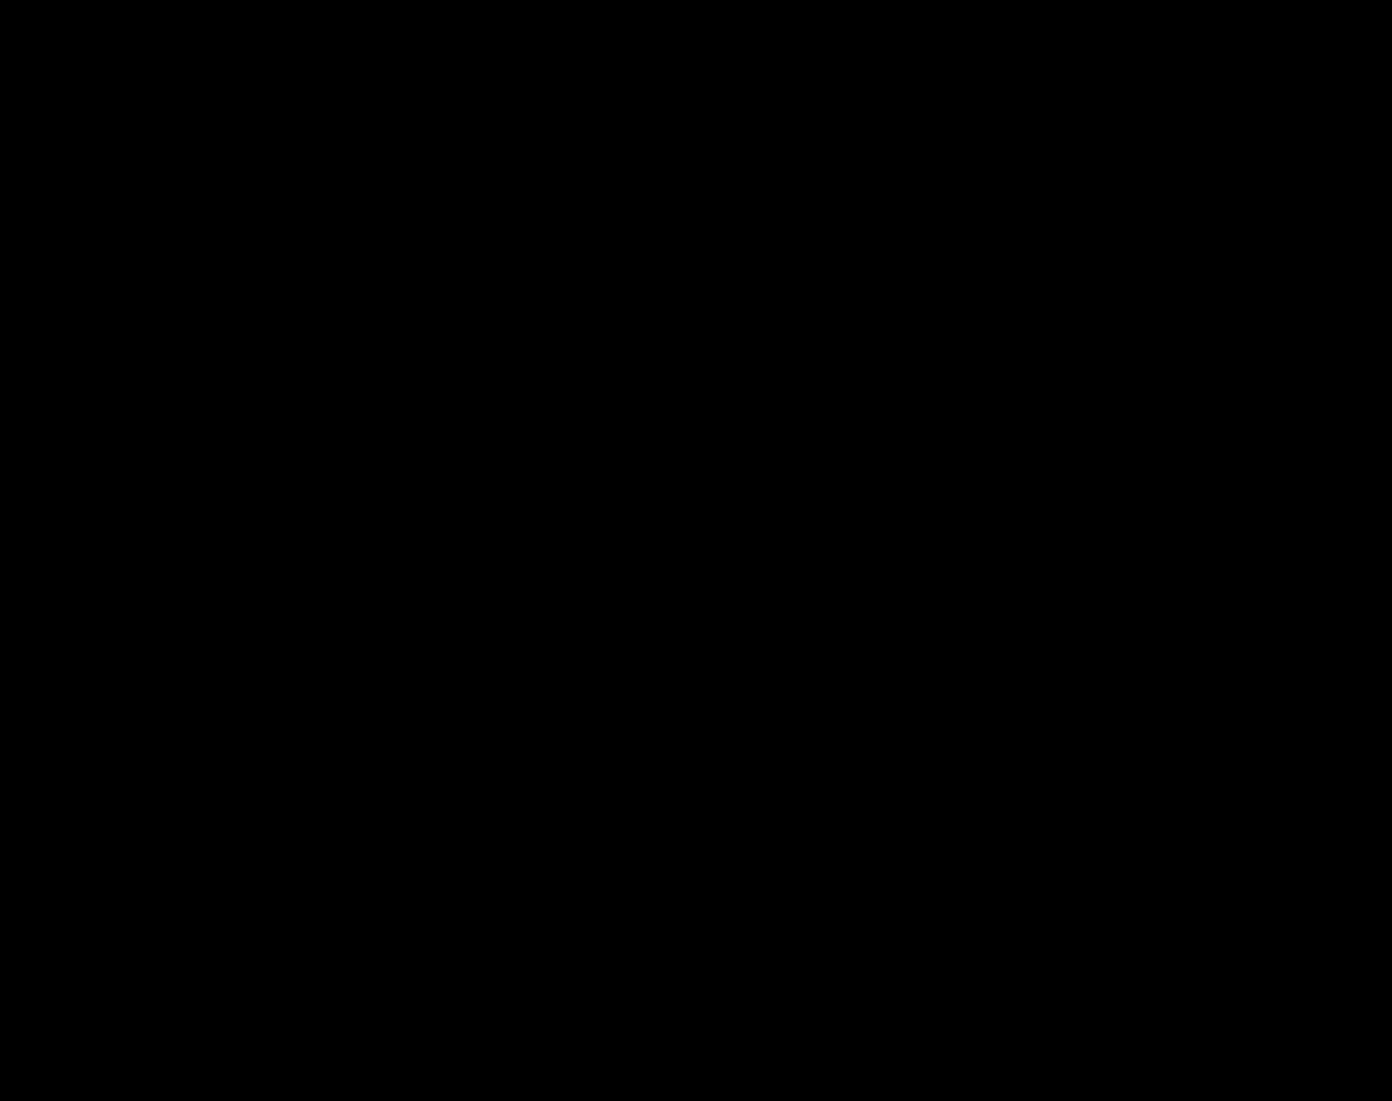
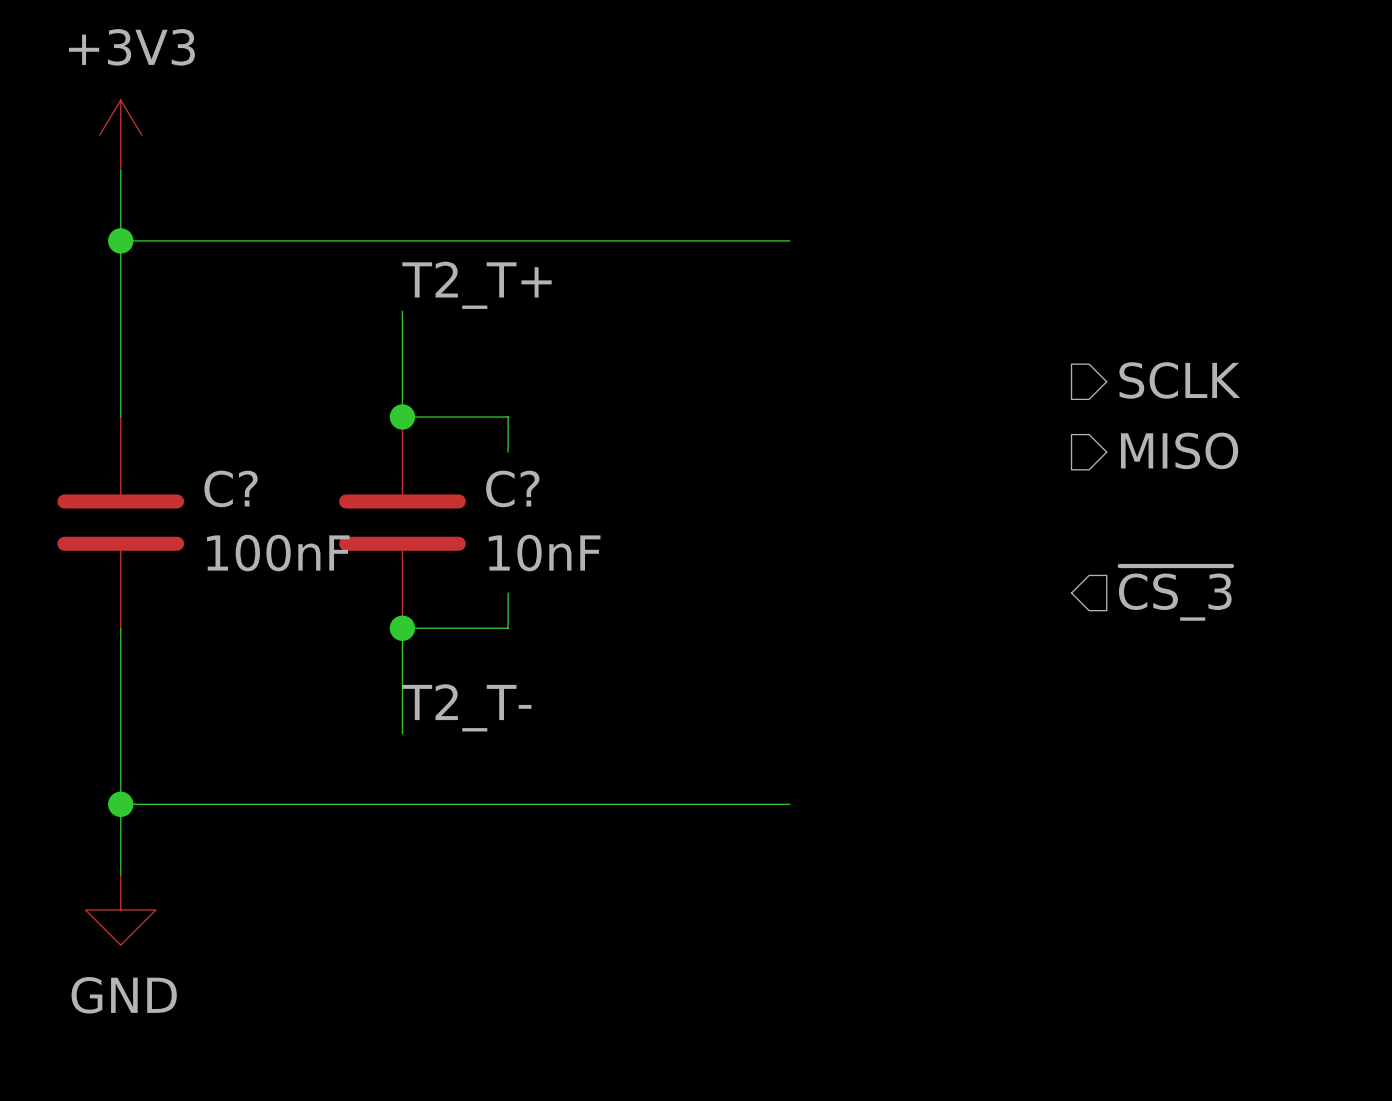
power symbol: none -> +3V3 (120, 135)
wire: none -> (120, 170) (120, 416)
wire: none -> (120, 240) (789, 240)
junction: none -> (120, 240)
label: none -> T2_T+ (477, 285)
wire: none -> (402, 311) (402, 416) (508, 416) (508, 452)
hierarchical label: none -> SCLK (1179, 380)
junction: none -> (402, 416)
hierarchical label: none -> MISO (1179, 450)
C?: none -> 100nF (120, 522)
C?: none -> 10nF (402, 522)
wire: none -> (508, 593) (508, 628) (402, 628) (402, 733)
hierarchical label: none -> ~{CS_3} (1175, 593)
wire: none -> (120, 628) (120, 874)
junction: none -> (402, 628)
label: none -> T2_T- (466, 707)
wire: none -> (120, 804) (789, 804)
junction: none -> (120, 804)
power symbol: none -> GND (120, 909)

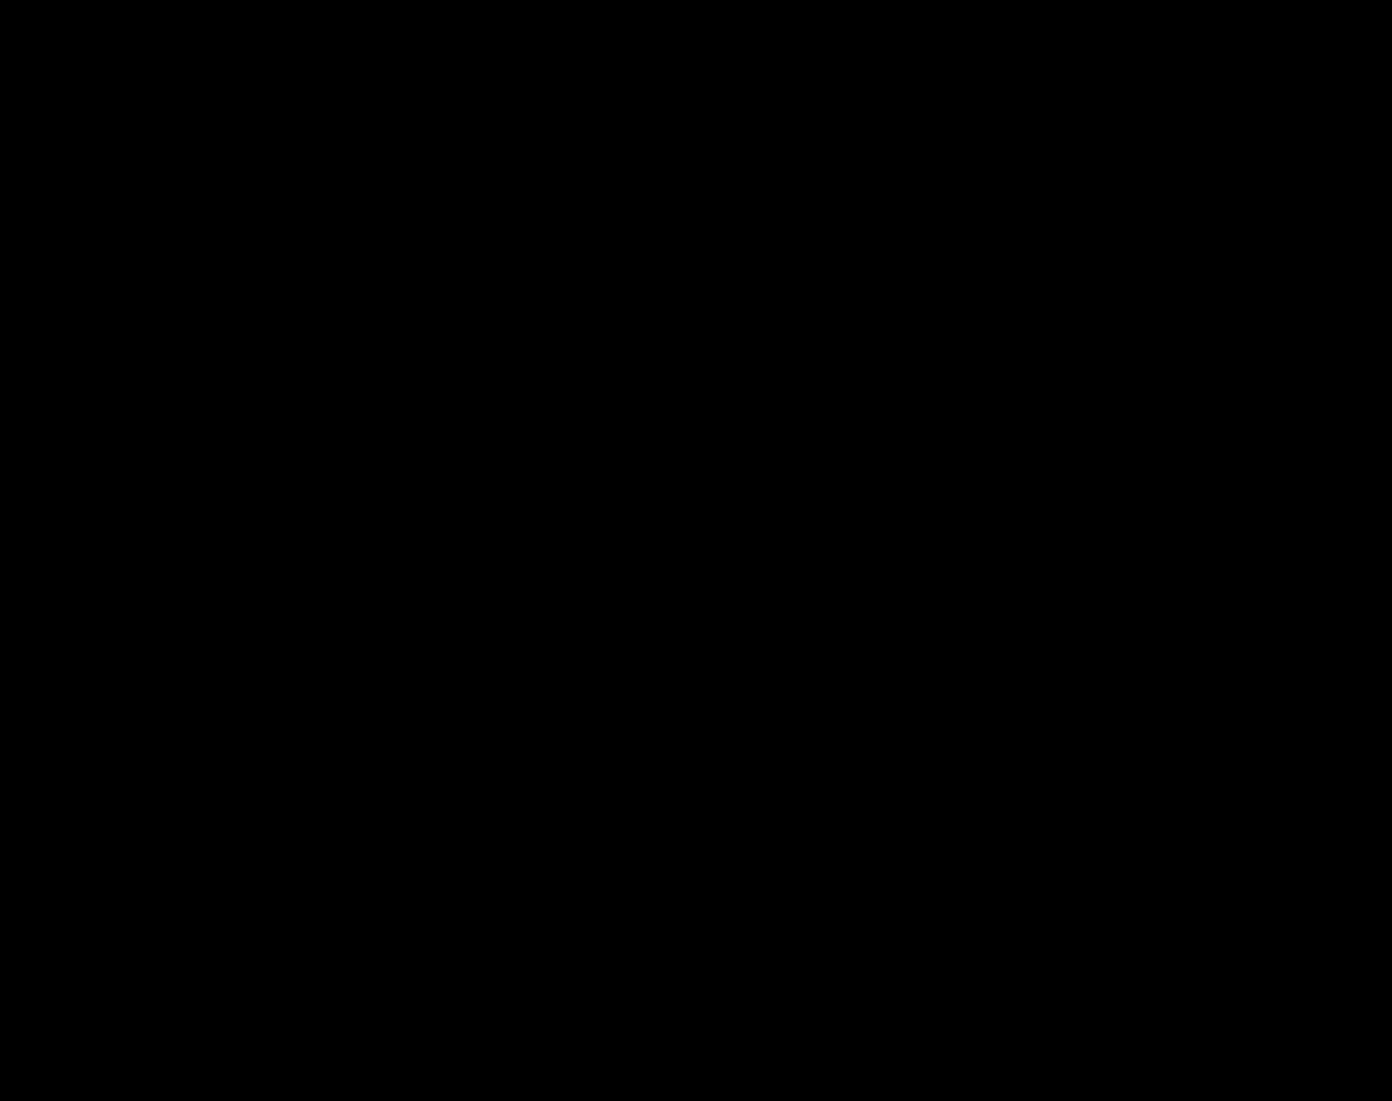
power symbol: +3V3 (120, 135) -> none
wire: (120, 170) (120, 416) -> none
wire: (120, 240) (789, 240) -> none
junction: (120, 240) -> none
label: T2_T+ (477, 285) -> none
wire: (402, 311) (402, 416) (508, 416) (508, 452) -> none
hierarchical label: SCLK (1179, 380) -> none
junction: (402, 416) -> none
hierarchical label: MISO (1179, 450) -> none
C?: 100nF (120, 522) -> none
C?: 10nF (402, 522) -> none
wire: (508, 593) (508, 628) (402, 628) (402, 733) -> none
hierarchical label: ~{CS_3} (1175, 593) -> none
wire: (120, 628) (120, 874) -> none
junction: (402, 628) -> none
label: T2_T- (466, 707) -> none
wire: (120, 804) (789, 804) -> none
junction: (120, 804) -> none
power symbol: GND (120, 909) -> none

